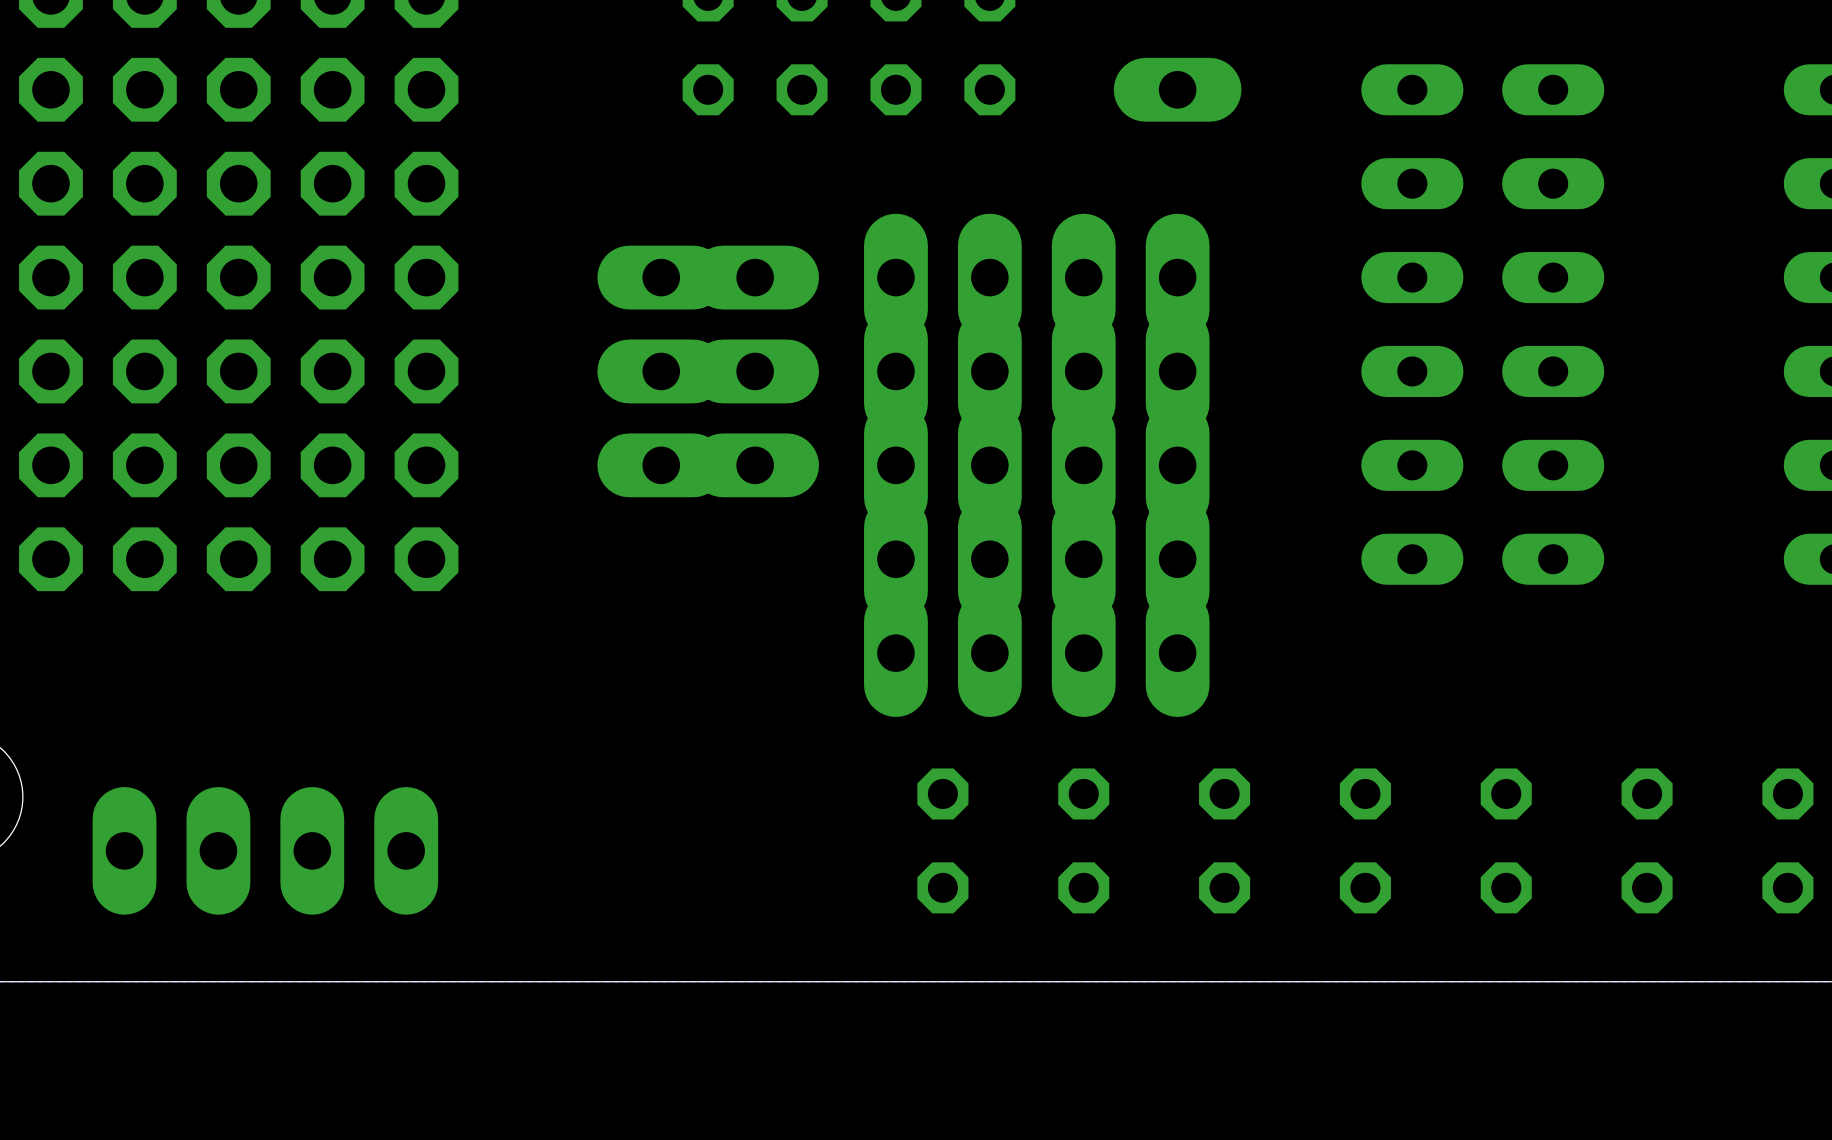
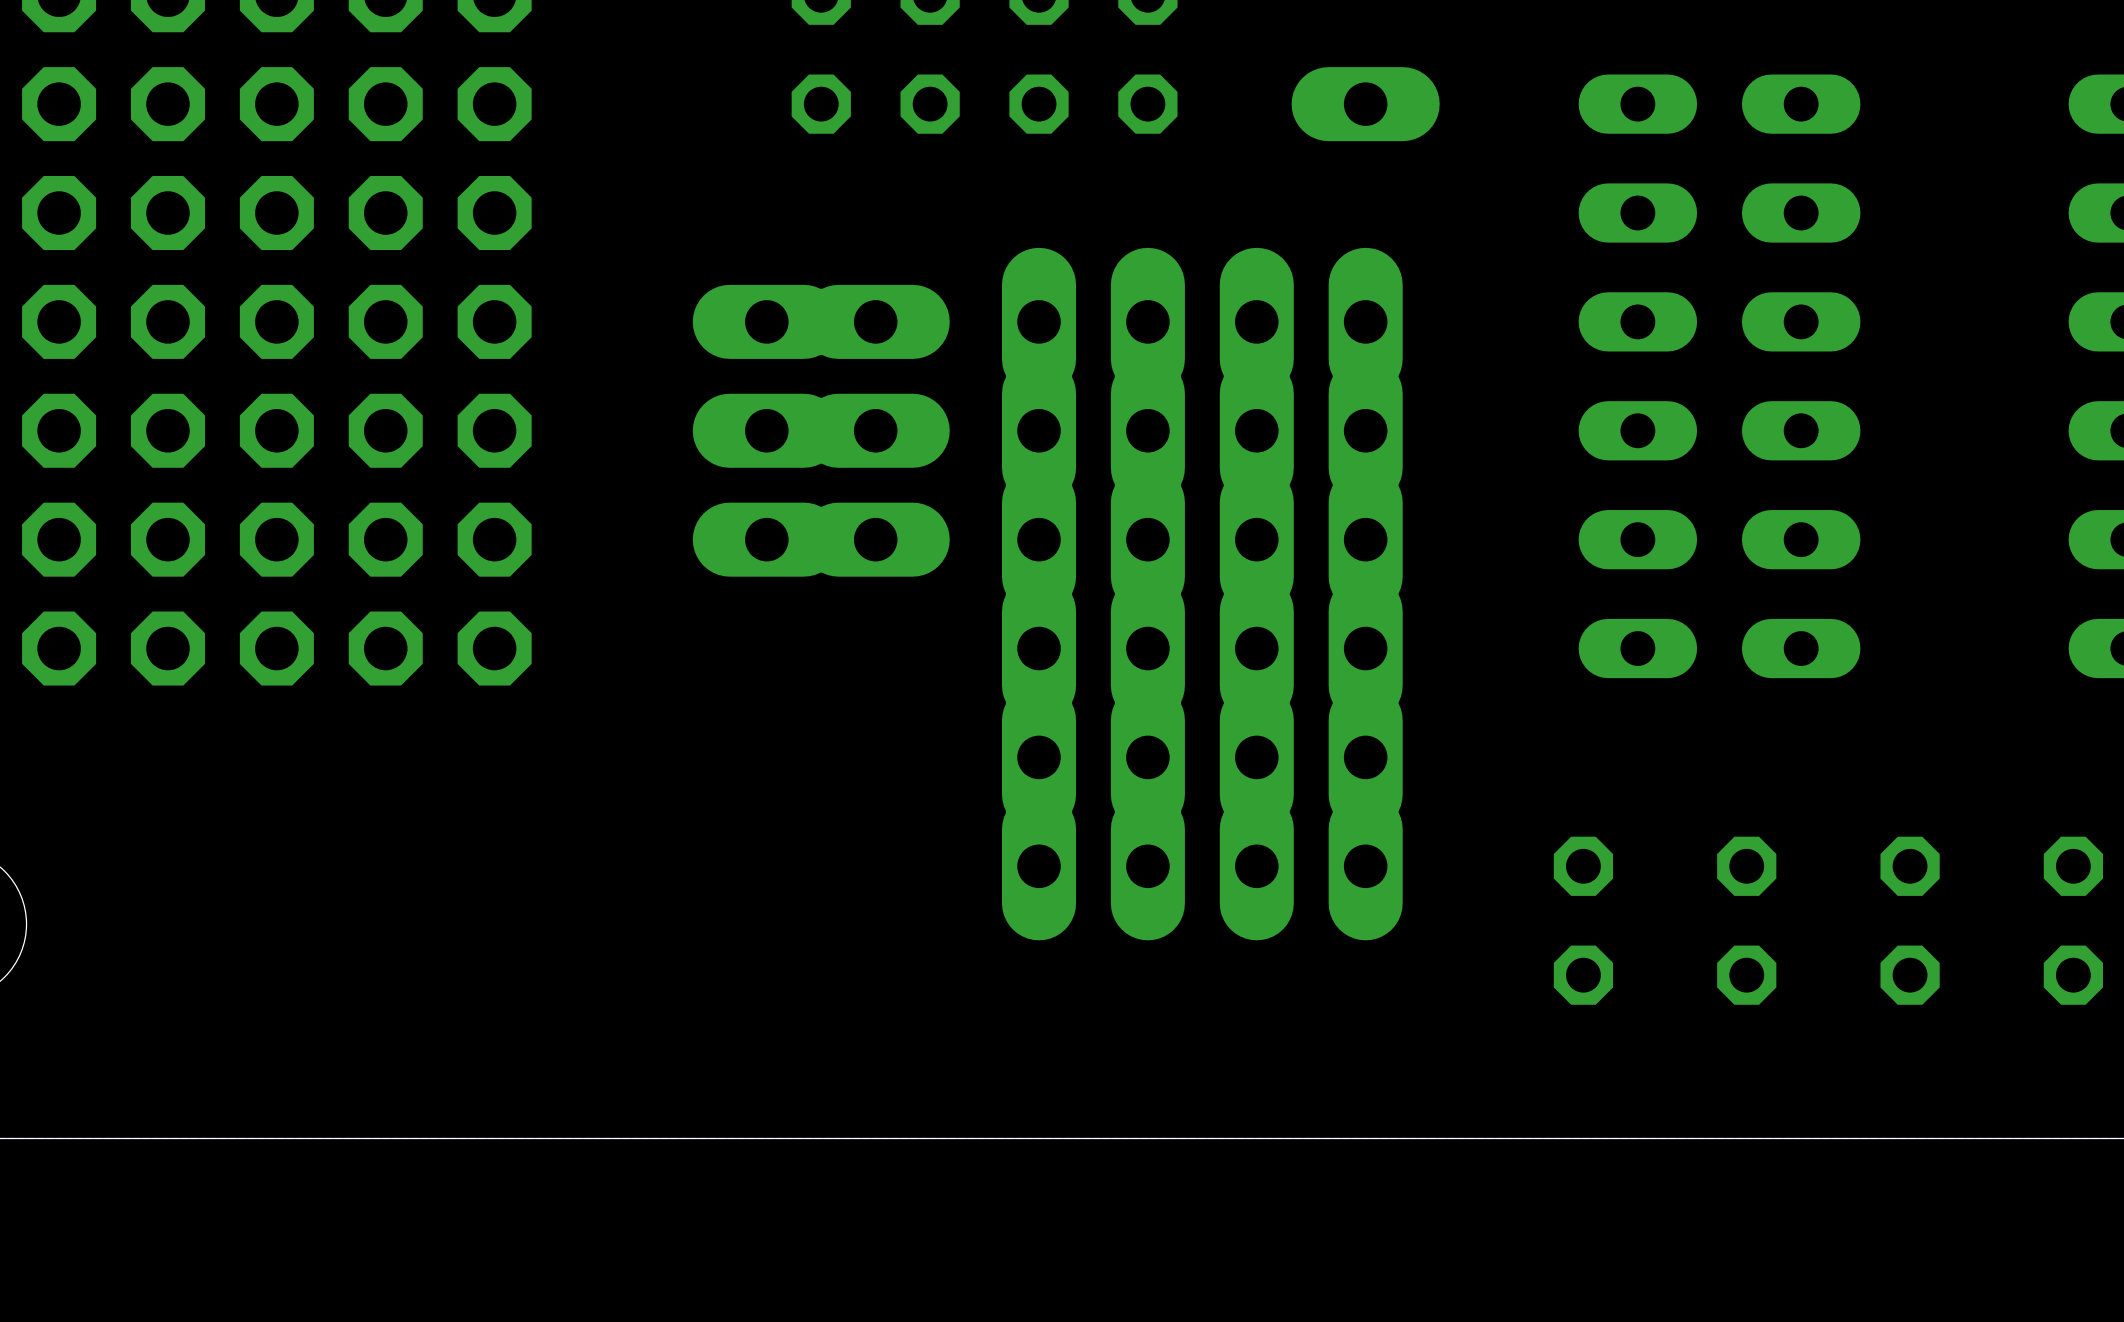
part: (942, 840) -> none
part: (1083, 840) -> none
part: (1224, 840) -> none
part position: (1365, 840) -> (1583, 920)
part position: (1506, 840) -> (1746, 920)
part position: (1647, 840) -> (1910, 920)
part position: (1787, 840) -> (2073, 920)
part position: (265, 850) -> (1202, 866)

